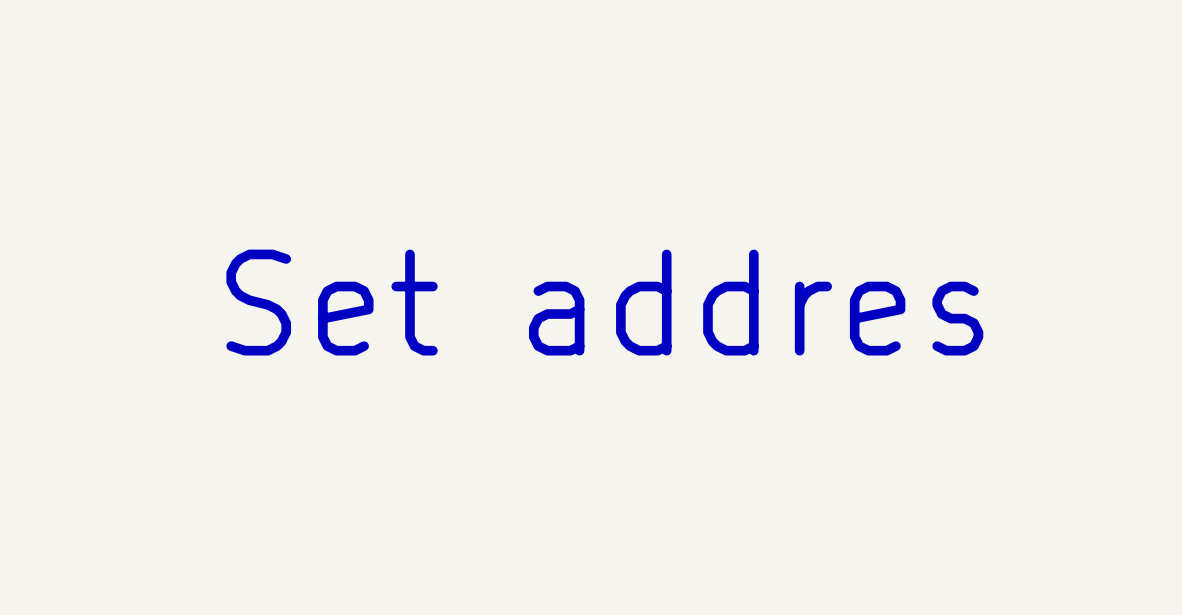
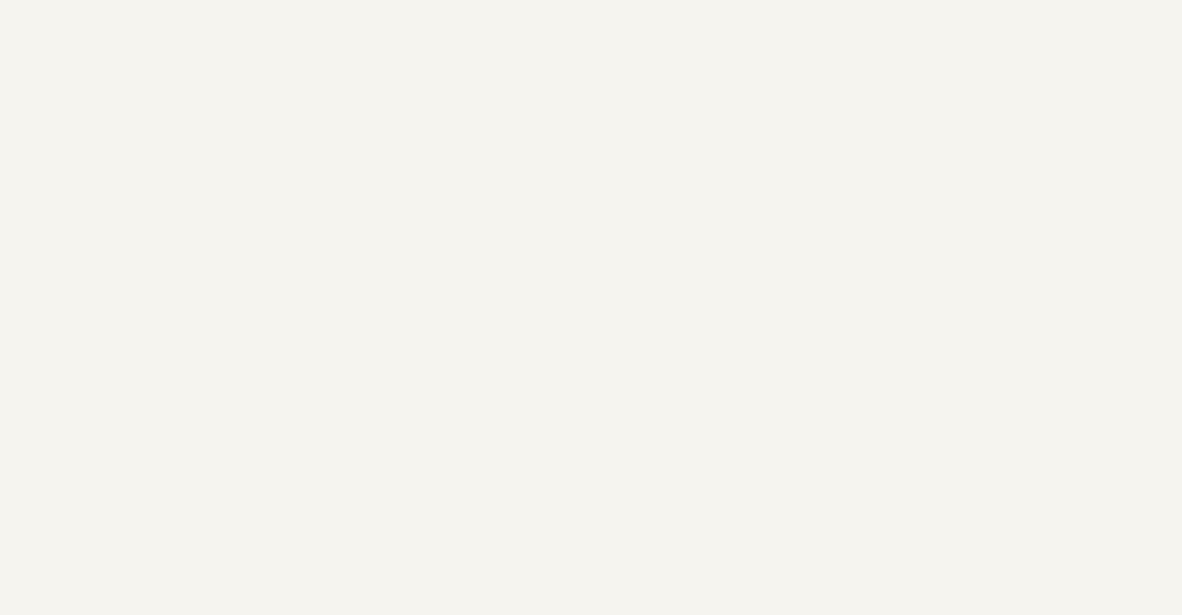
text: Set addres (604, 302) -> none

